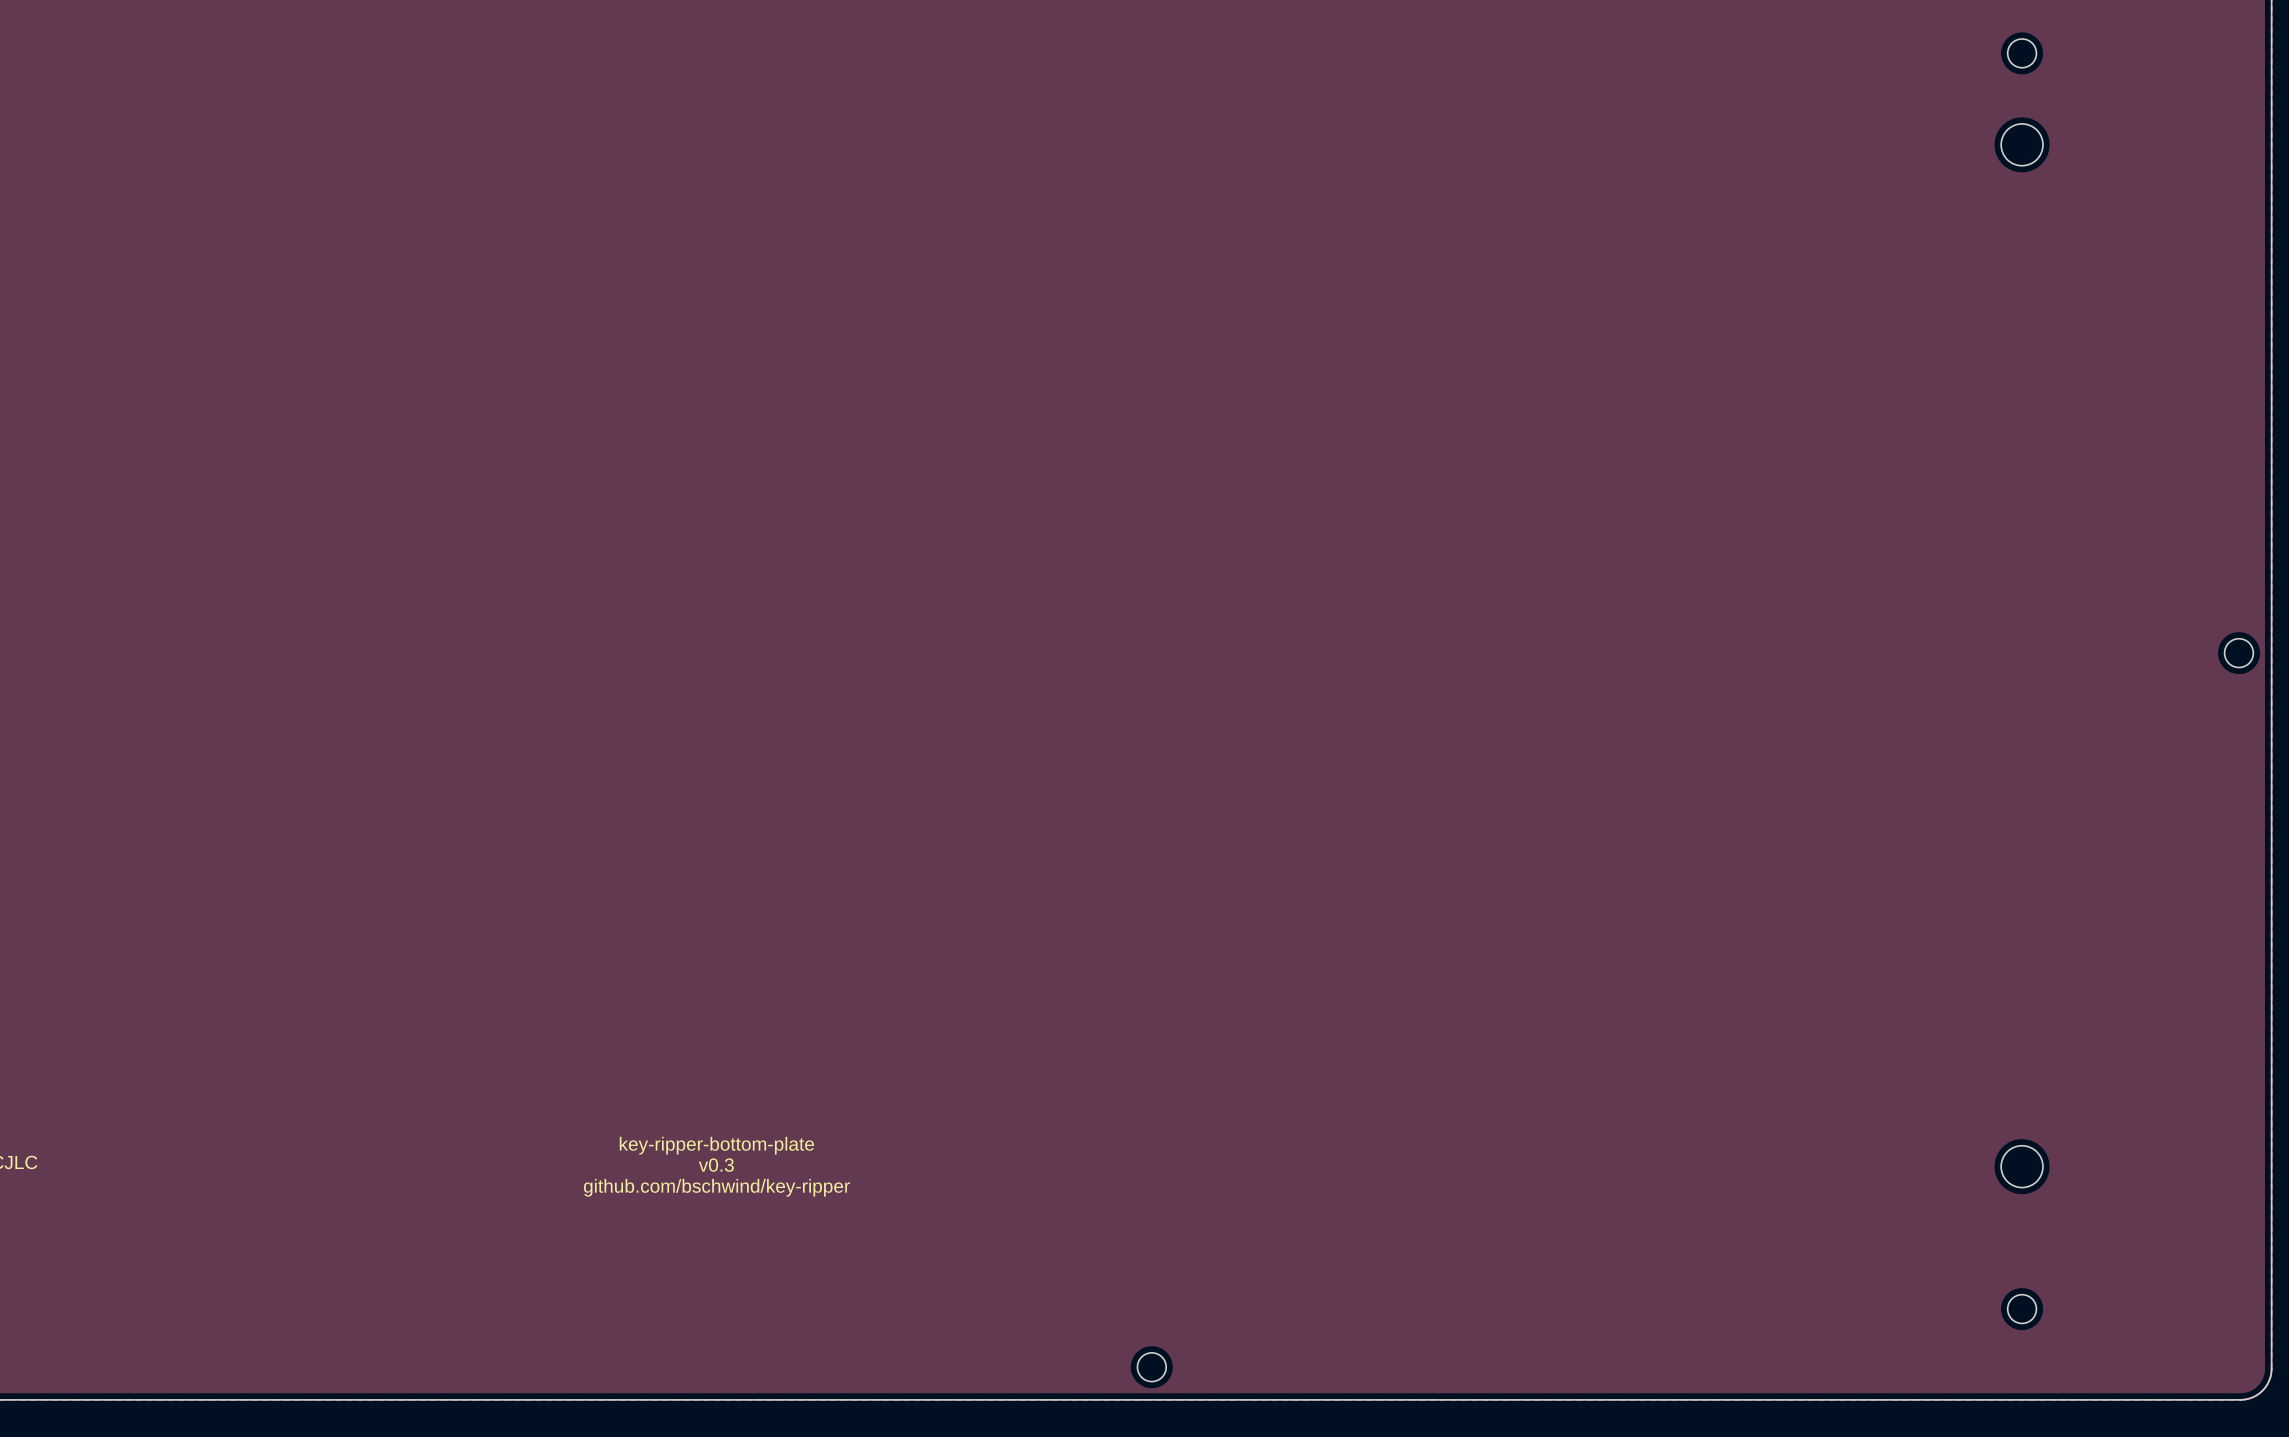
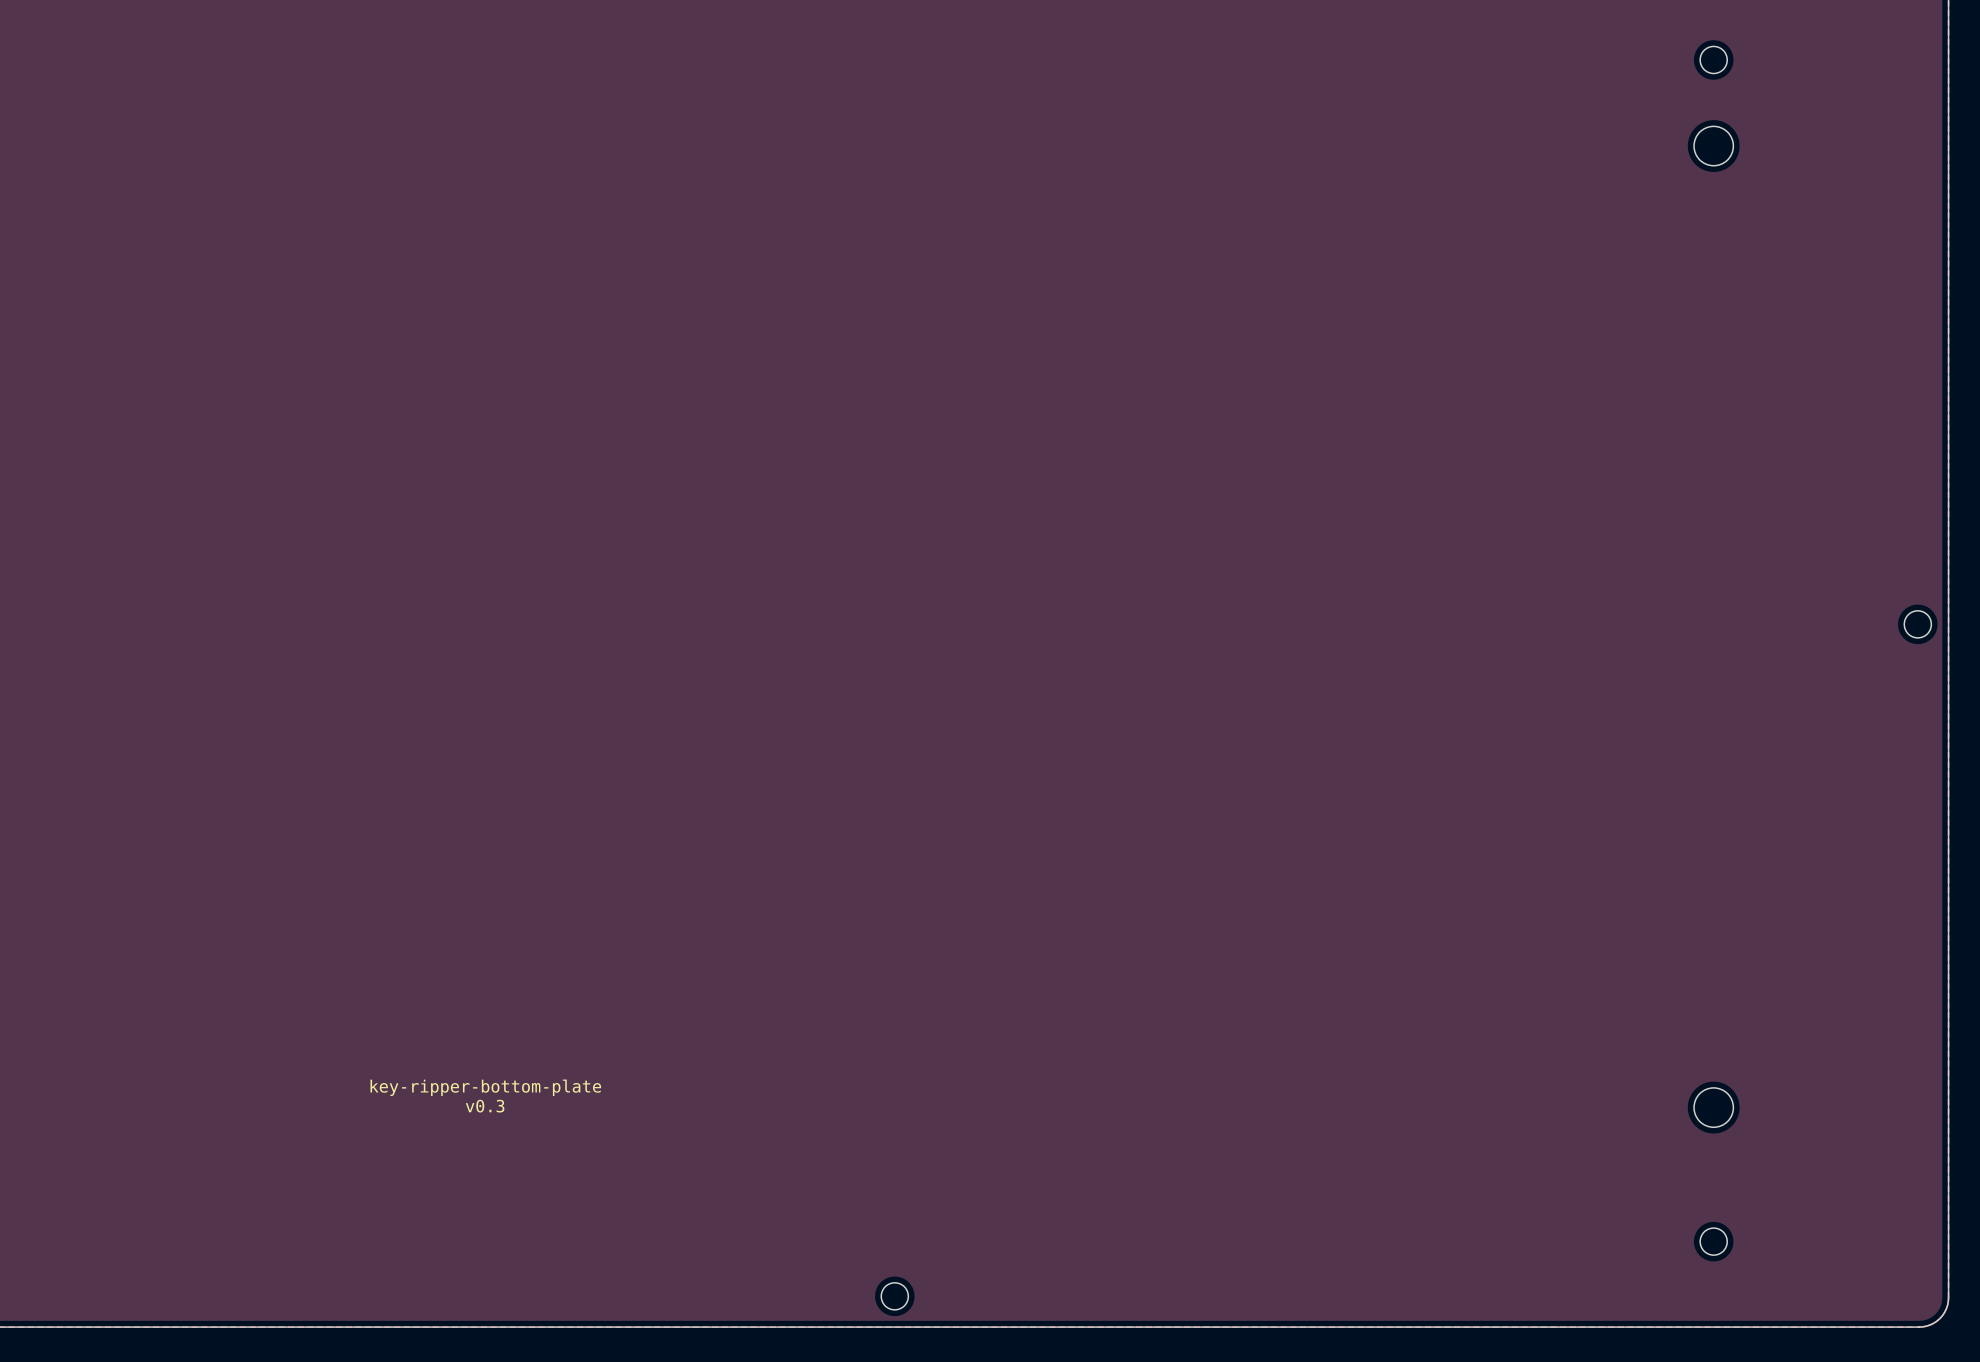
text: github.com/bschwind/key-ripper (716, 1187) -> none

